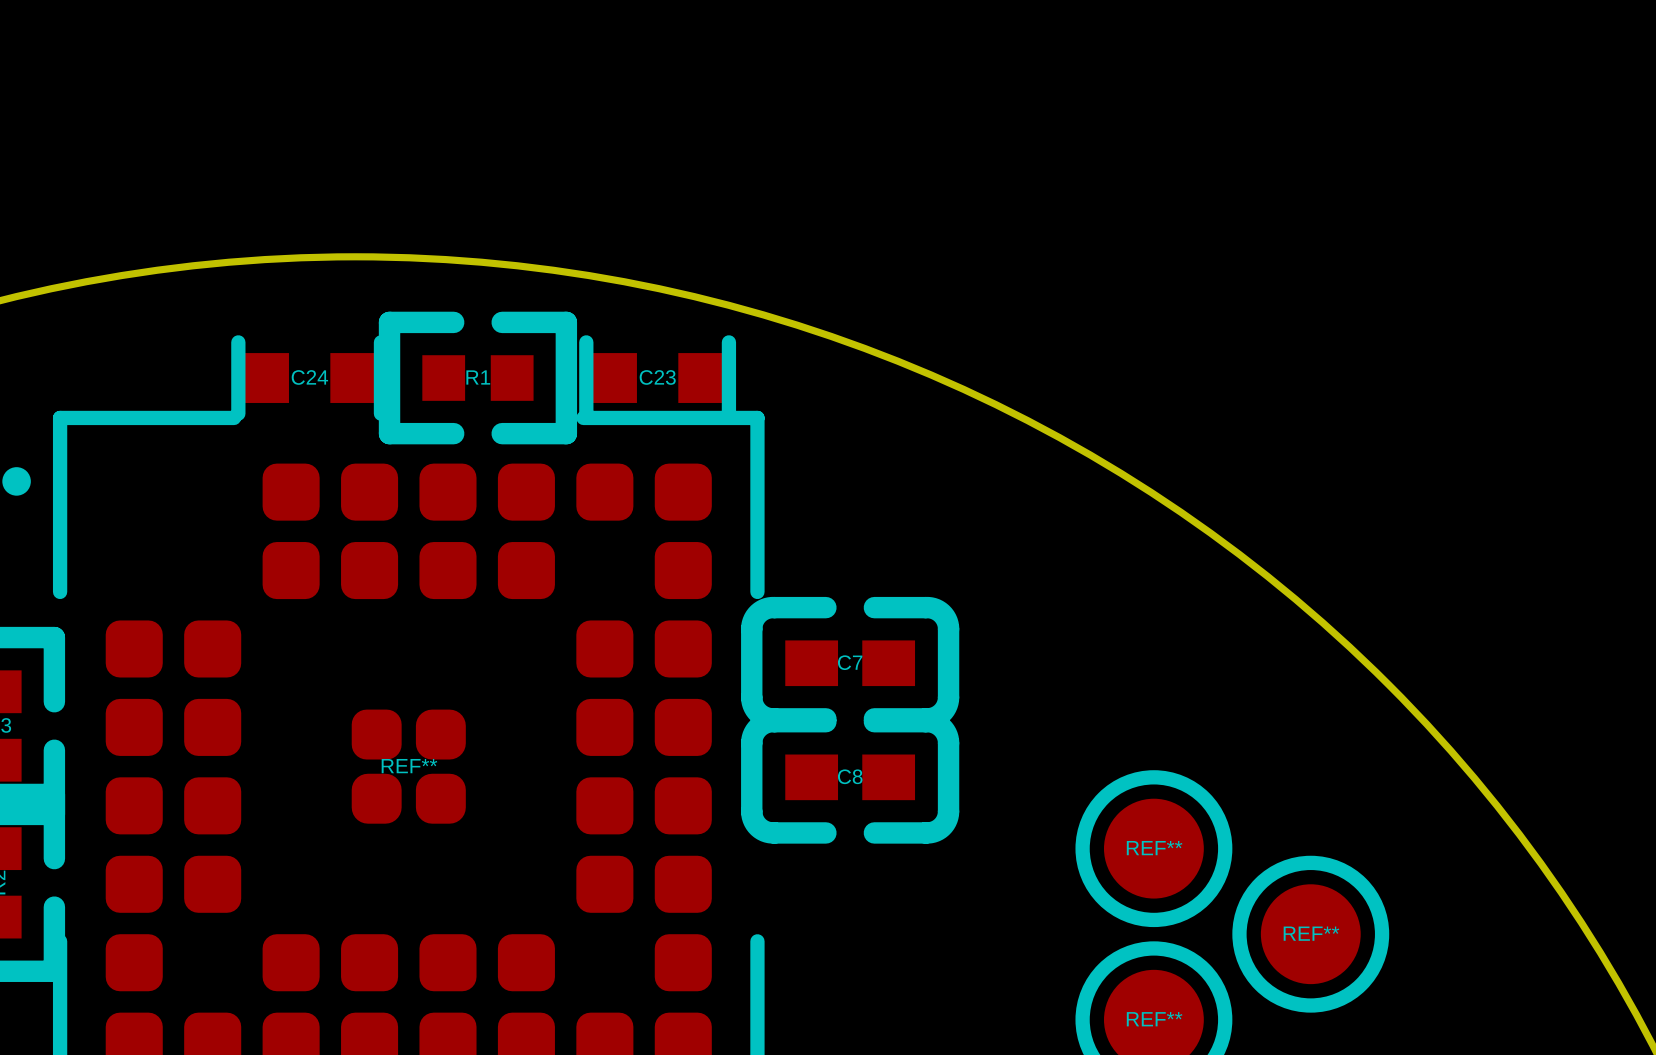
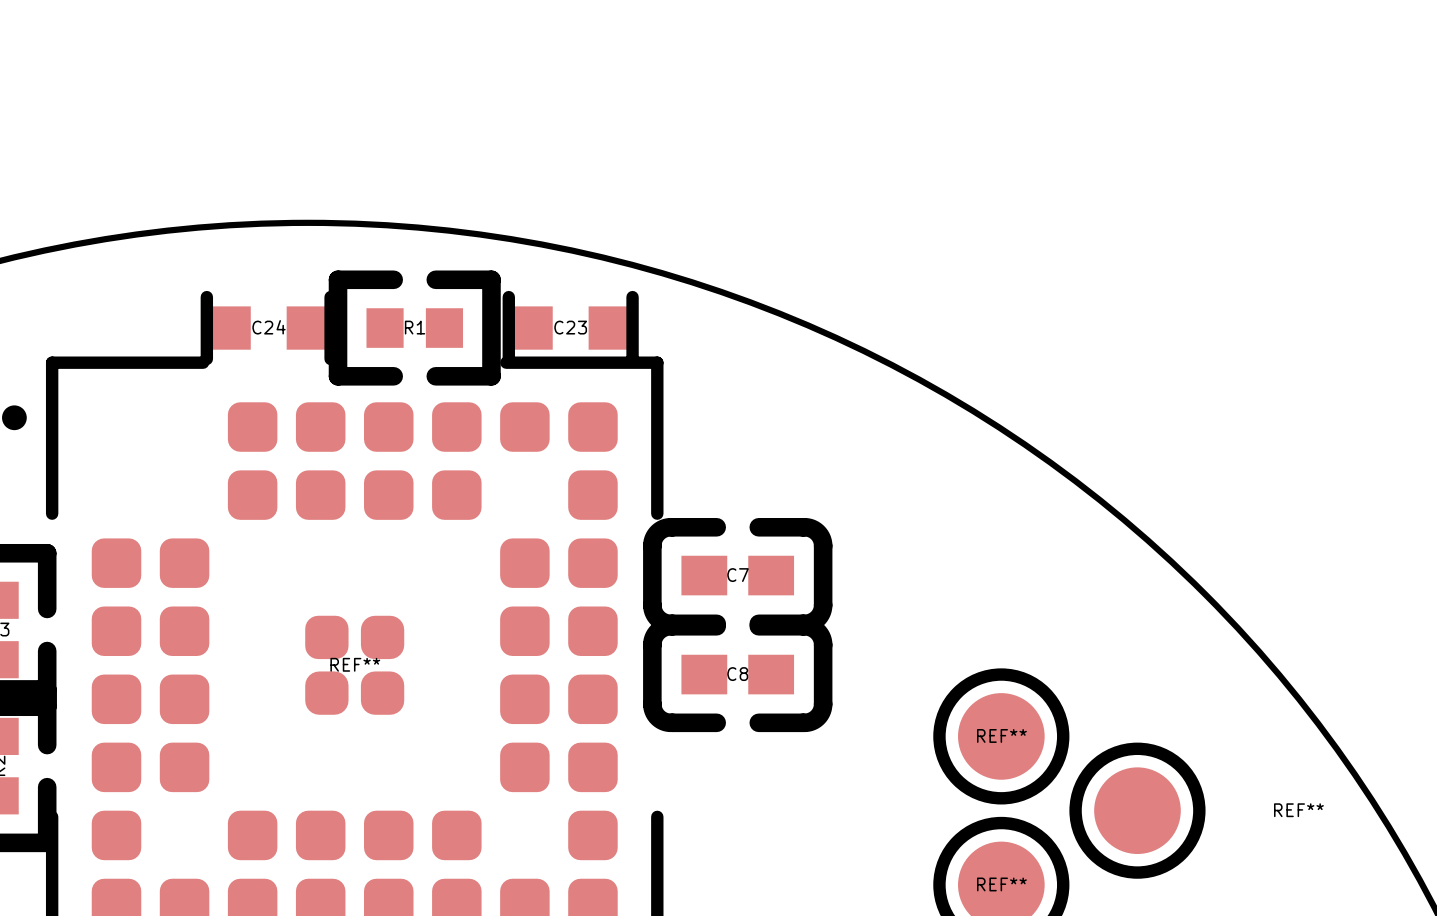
REF** name position: REF** (1311, 933) -> REF** (1298, 810)

